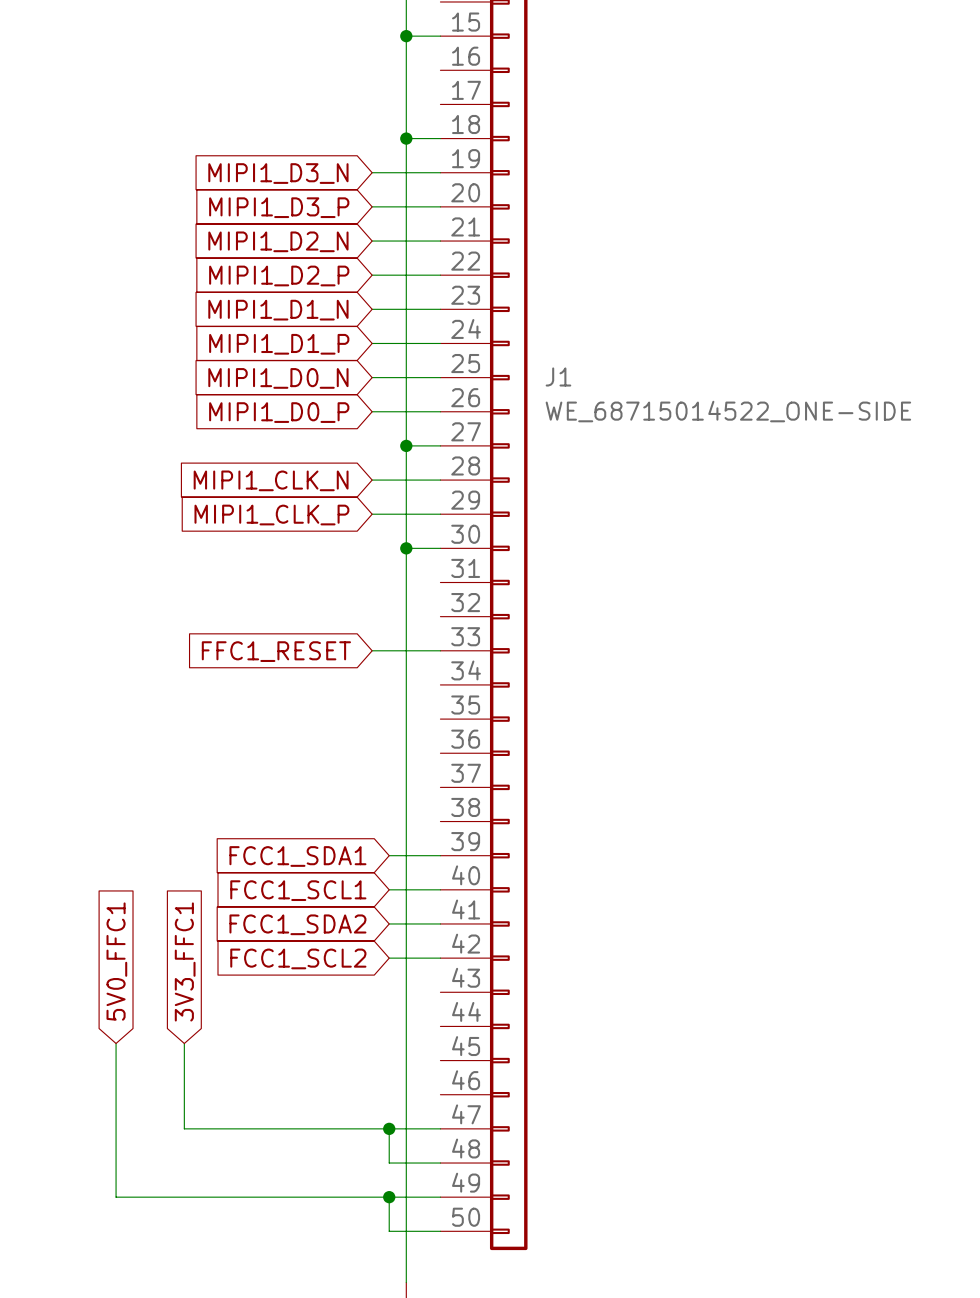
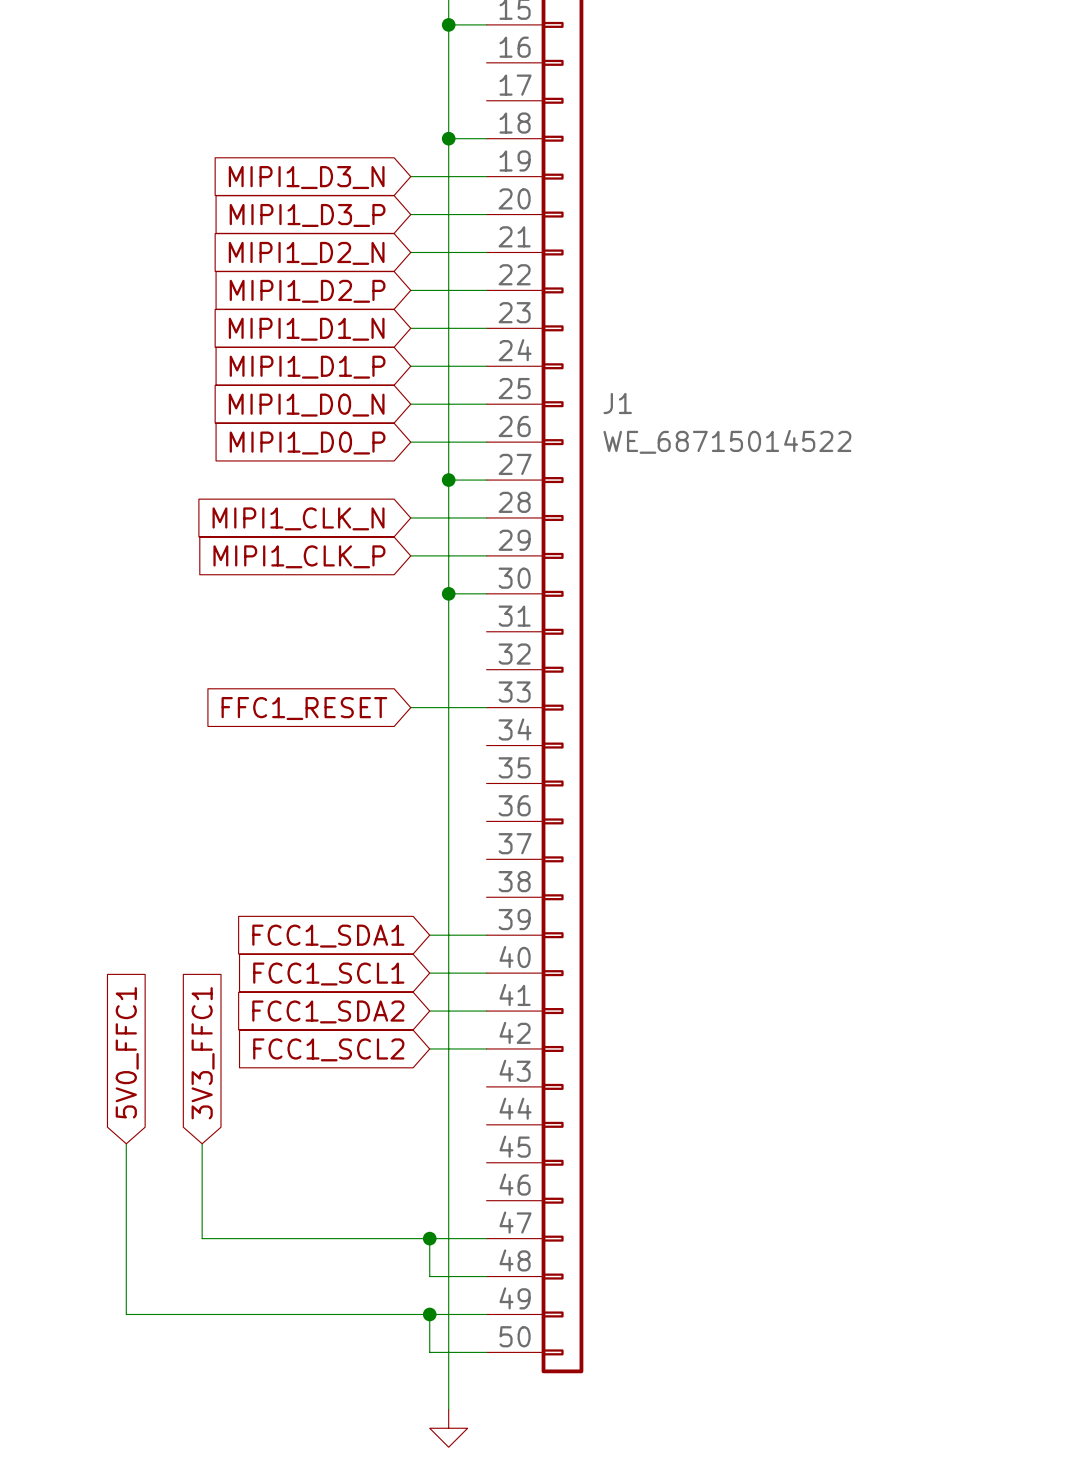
J1 value: WE_68715014522_ONE-SIDE (728, 411) -> WE_68715014522 (727, 441)

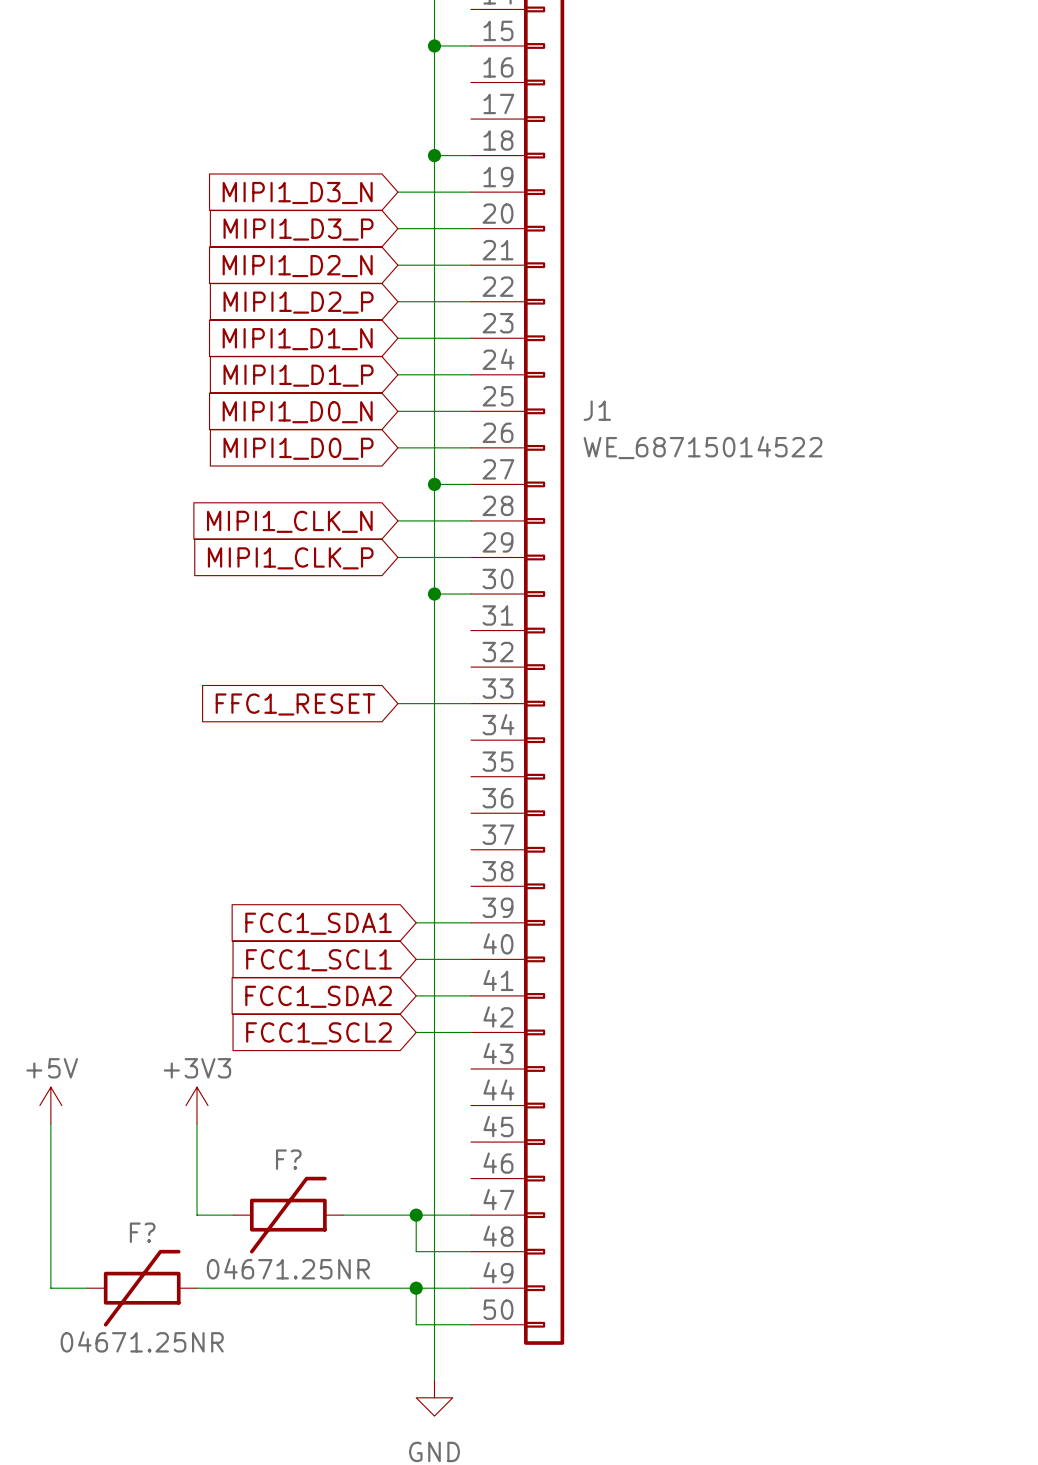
global label: 5V0_FFC1 (127, 1052) -> none
global label: 3V3_FFC1 (203, 1053) -> none
power symbol: none -> +5V (50, 1105)
power symbol: none -> +3V3 (197, 1105)
wire: none -> (50, 1123) (50, 1288) (87, 1288)
wire: (126, 1143) (126, 1314) (202, 1314) -> none
wire: (240, 1238) (353, 1238) -> none
F?: none -> 04671.25NR (288, 1215)
F?: none -> 04671.25NR (142, 1288)

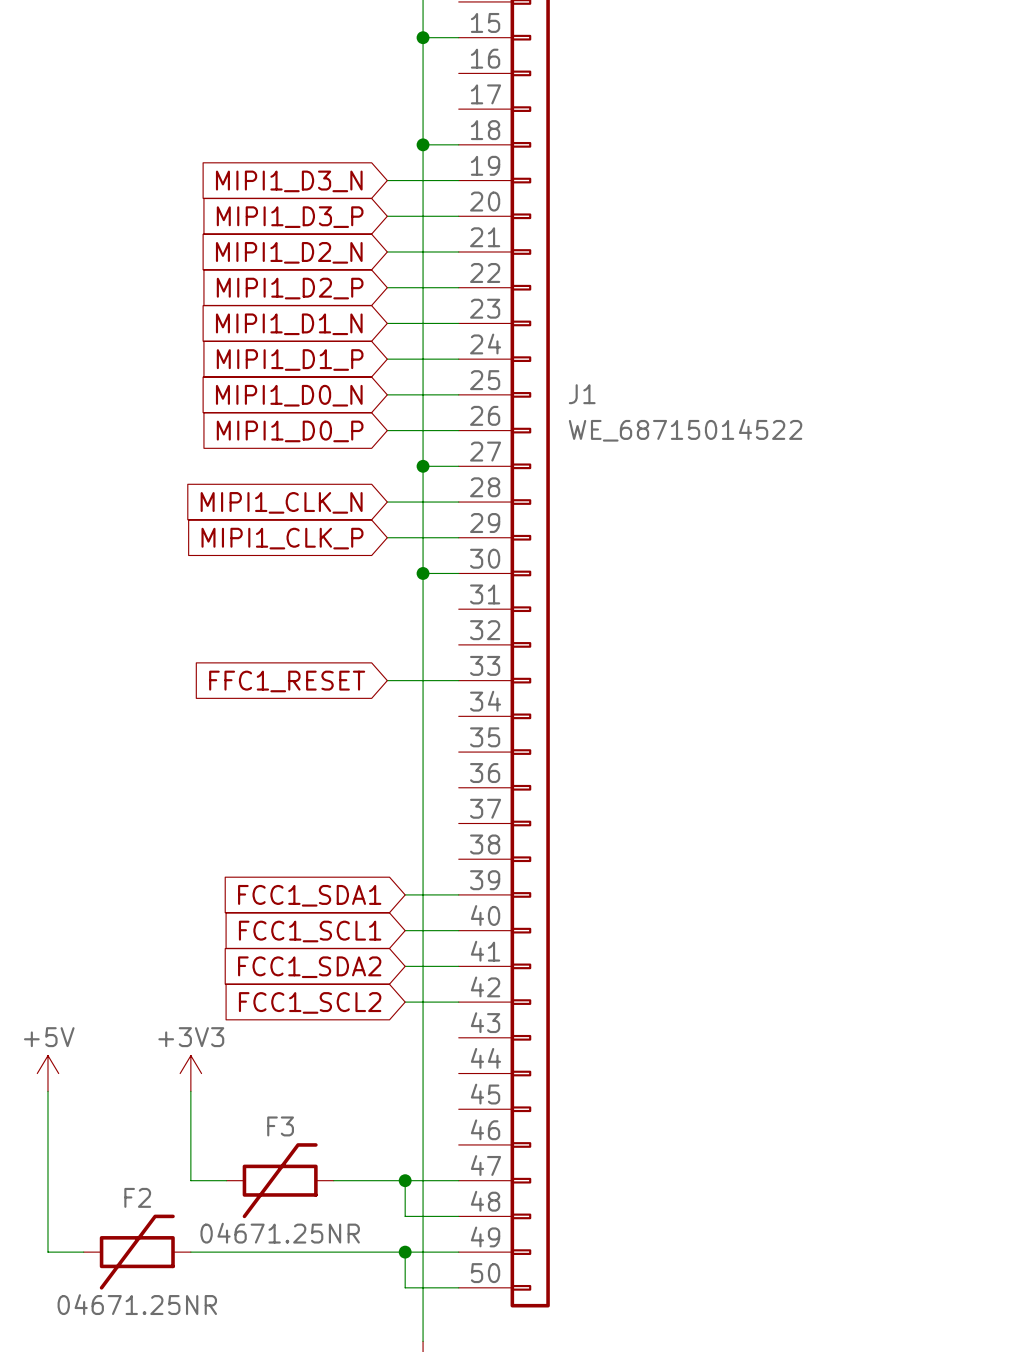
F? name: F? (288, 1159) -> F3 (280, 1126)
F? name: F? (142, 1232) -> F2 (137, 1197)

